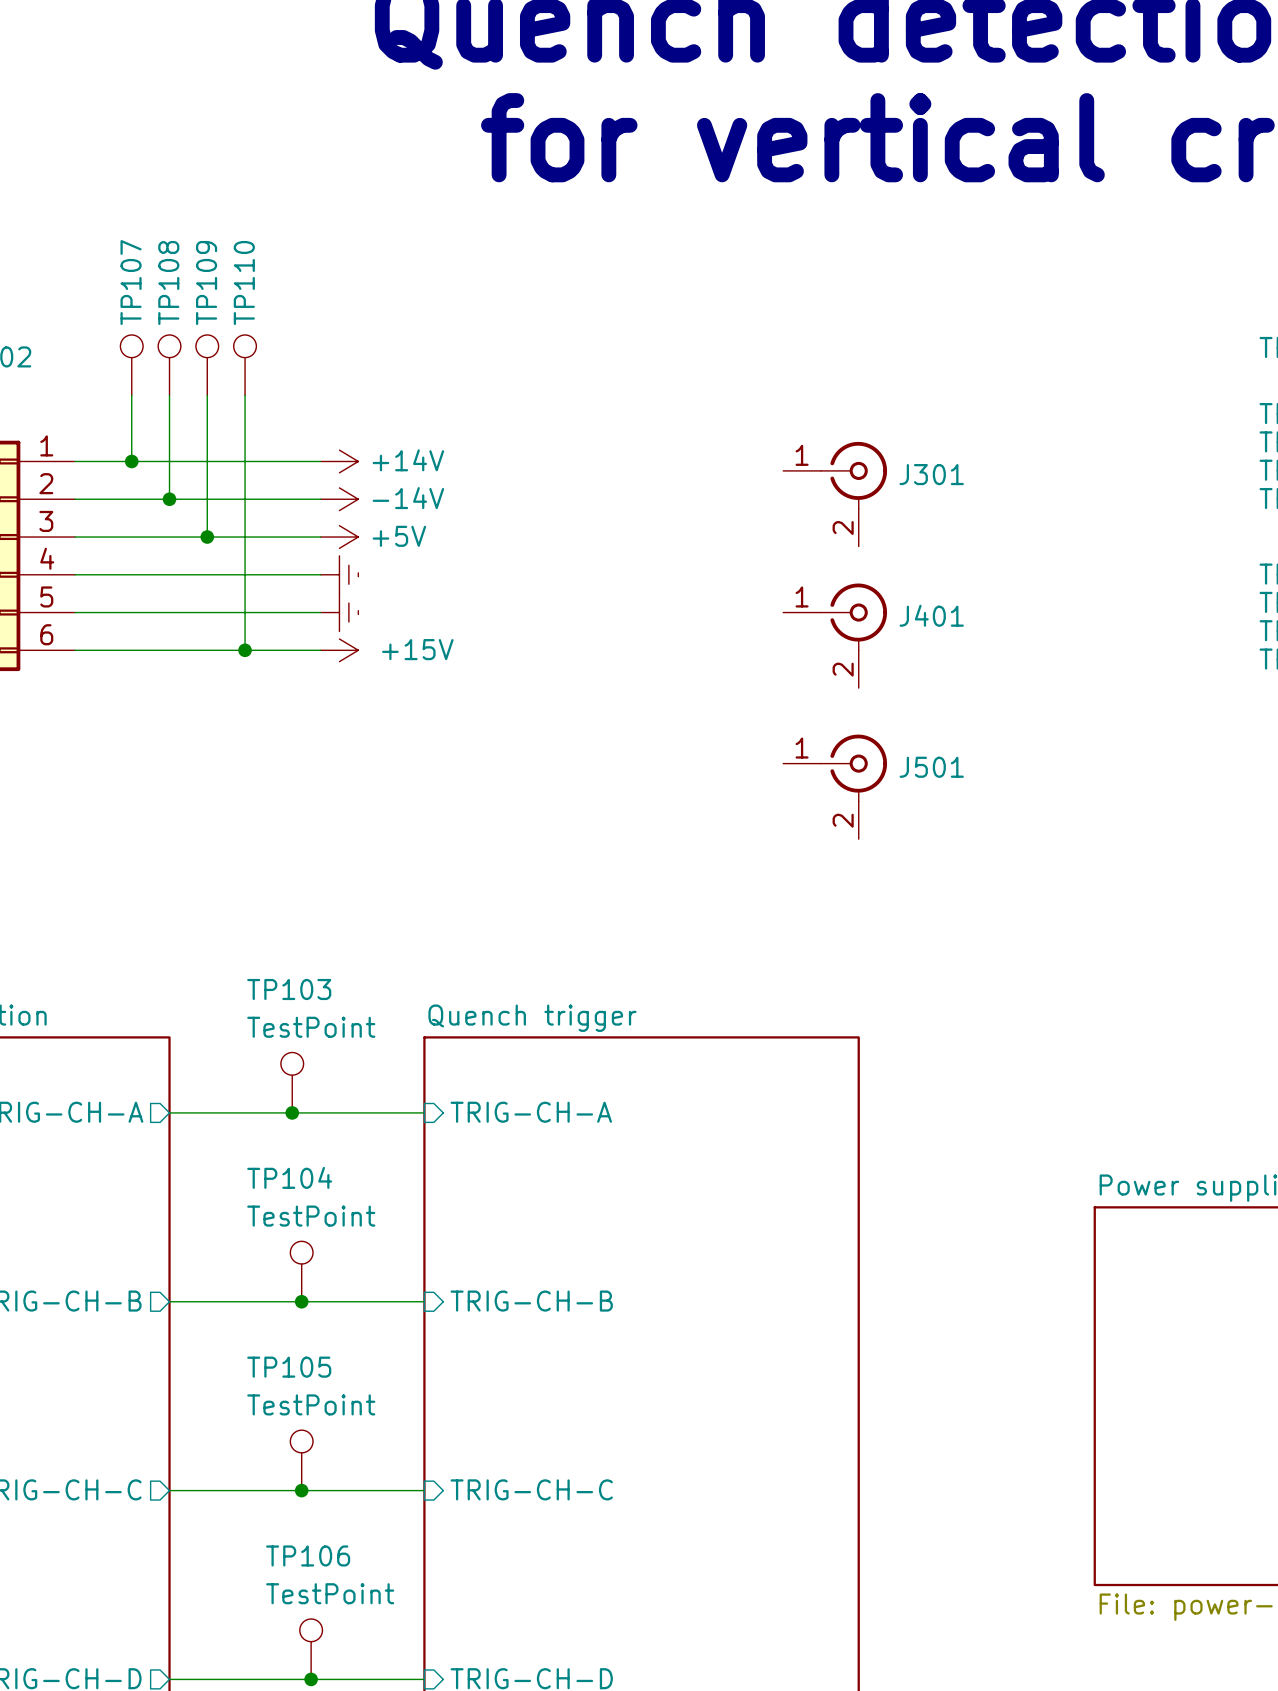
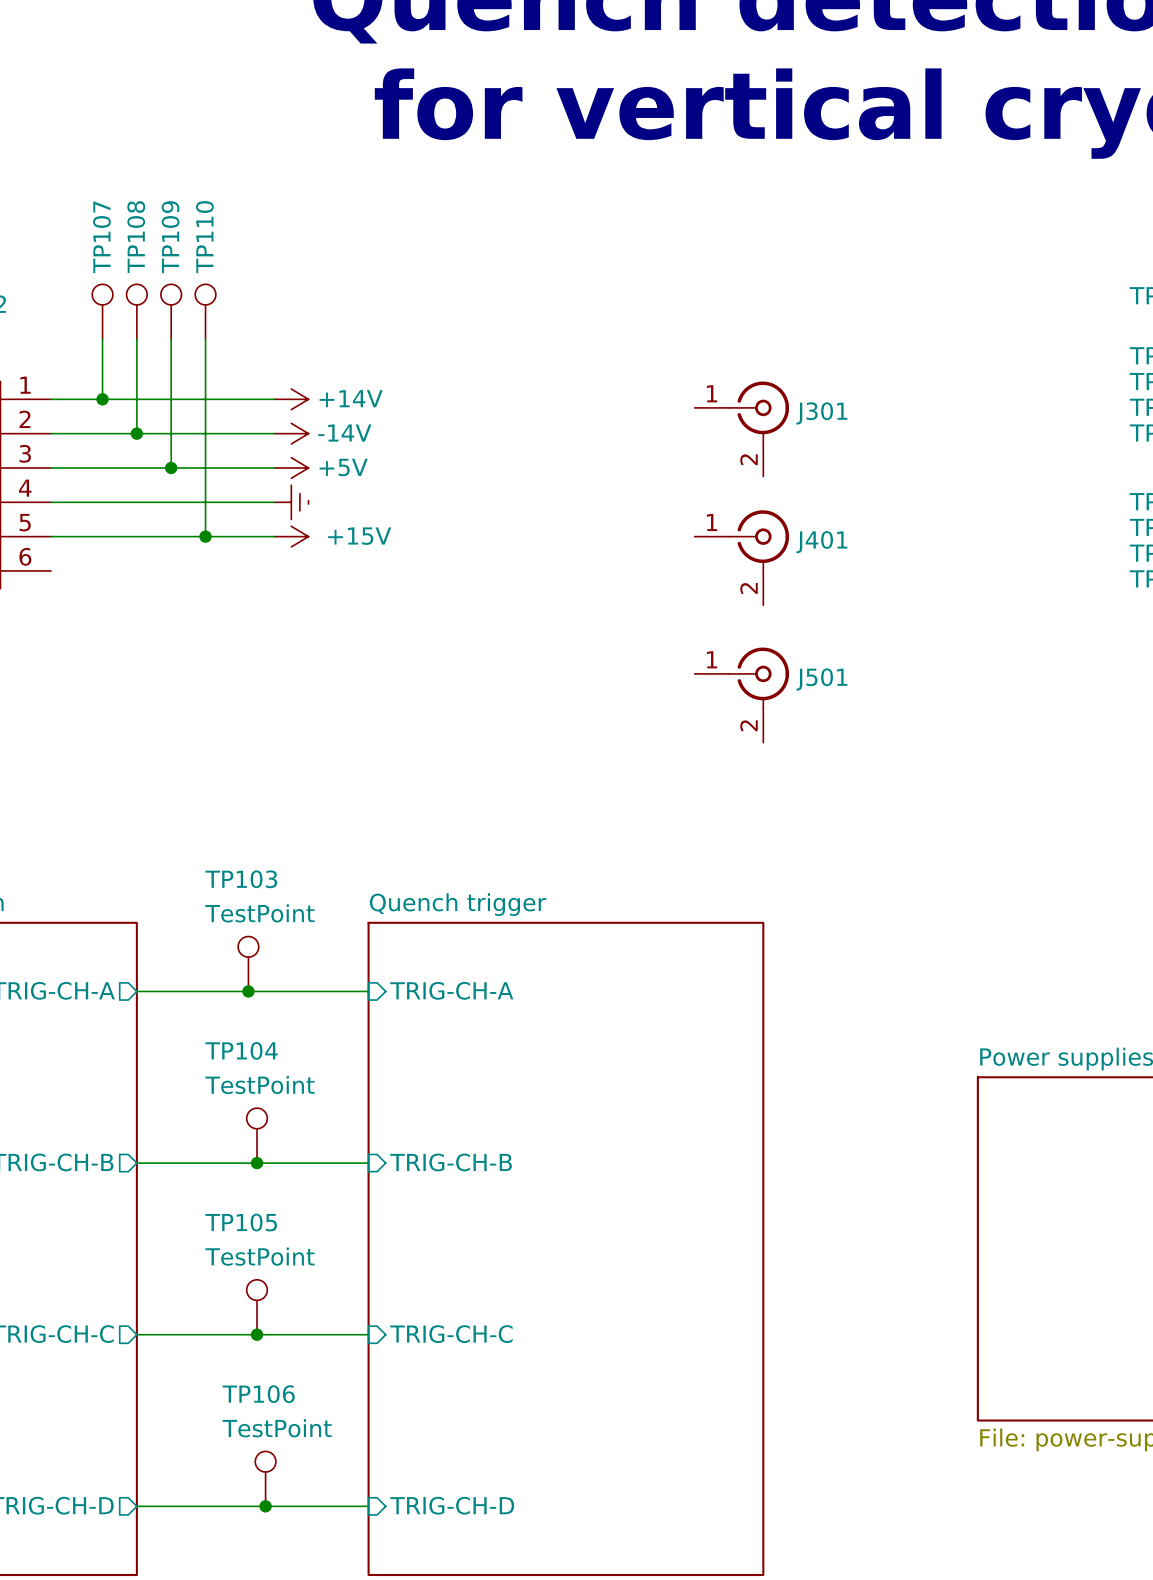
power symbol shape: [320, 593, 359, 632] -> [274, 526, 309, 547]
power symbol text: none -> +15V (359, 536)
wire: (245, 612) (245, 650) -> none
wire: (75, 650) (320, 650) -> none
junction position: (245, 650) -> (205, 536)
power symbol: +15V (339, 650) -> none

